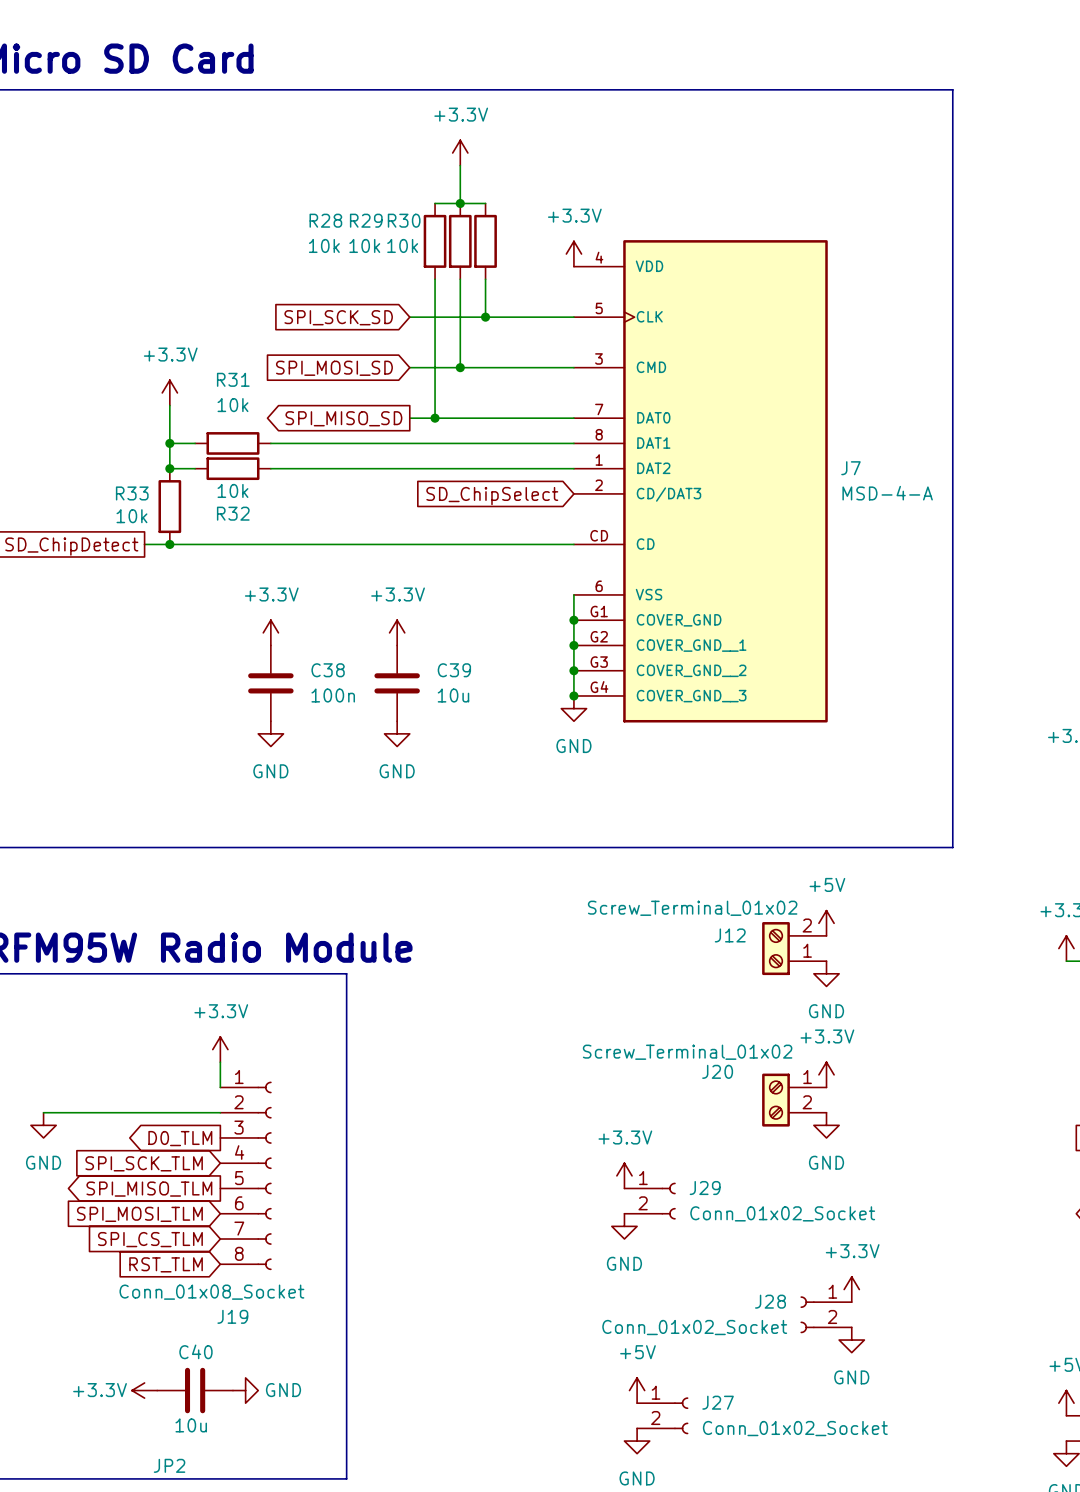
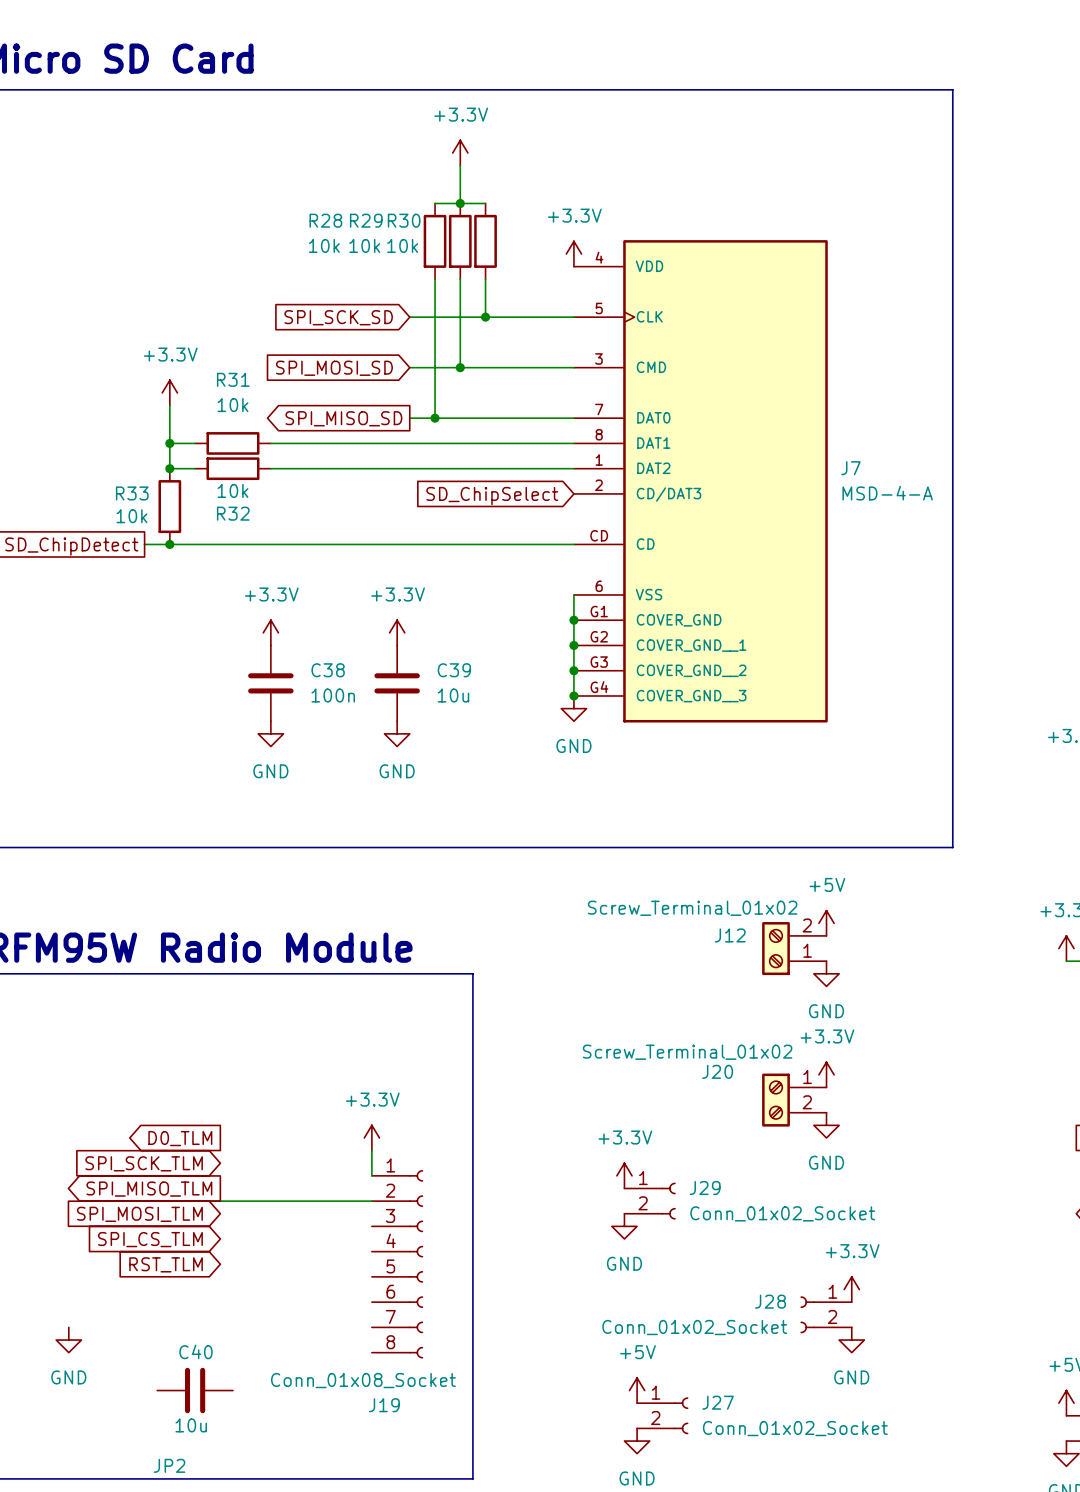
line: (346, 973) (346, 1478) -> (346, 973) (472, 973) (472, 1478) (346, 1478)
power symbol: +3.3V (220, 1049) -> none
wire: (220, 1062) (220, 1087) -> (371, 1150) (371, 1175)
wire: (43, 1112) (220, 1112) -> (195, 1201) (371, 1201)
power symbol: GND (43, 1125) -> none
power symbol: none -> +3.3V (371, 1137)
J19 position: (245, 1175) -> (397, 1264)
power symbol: none -> GND (68, 1340)
power symbol: +3.3V (144, 1390) -> none
power symbol: GND (245, 1390) -> none

